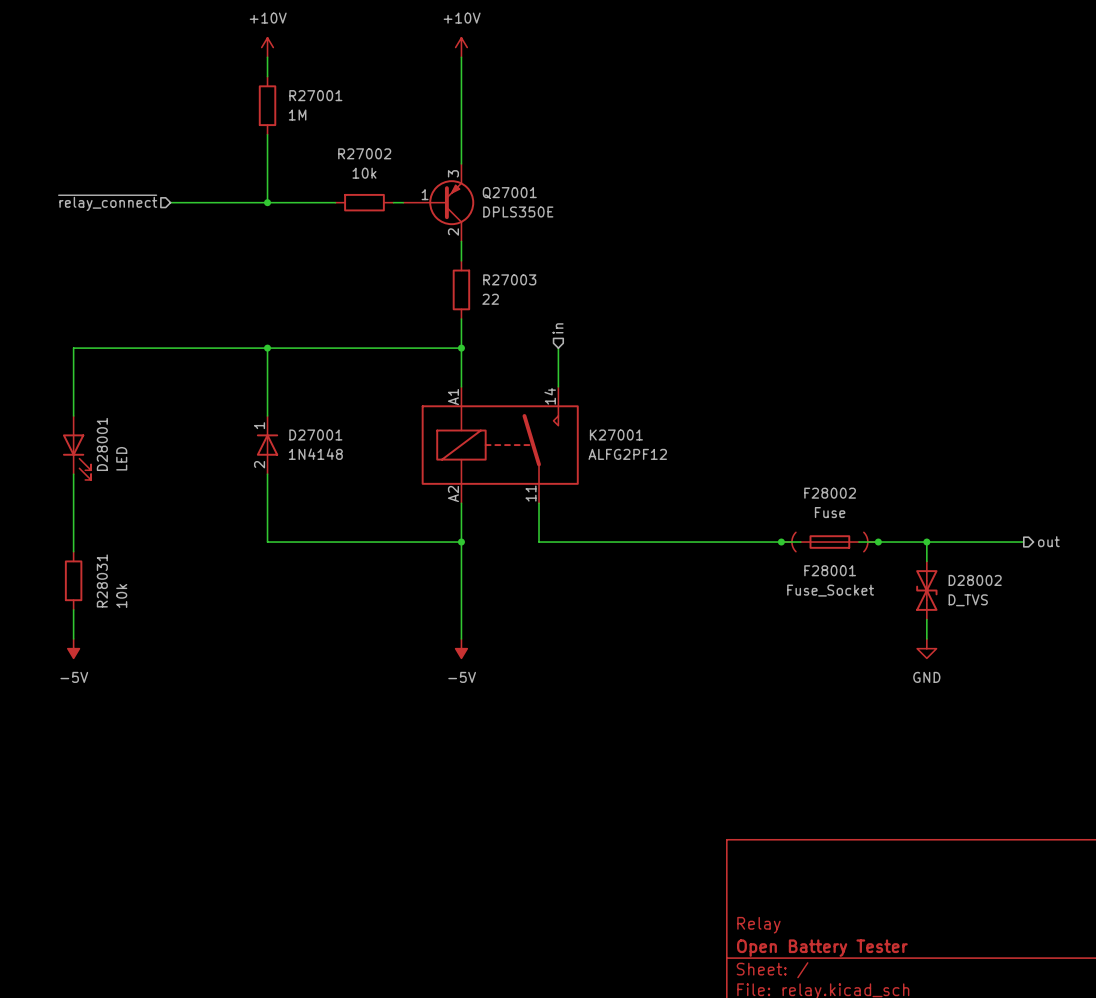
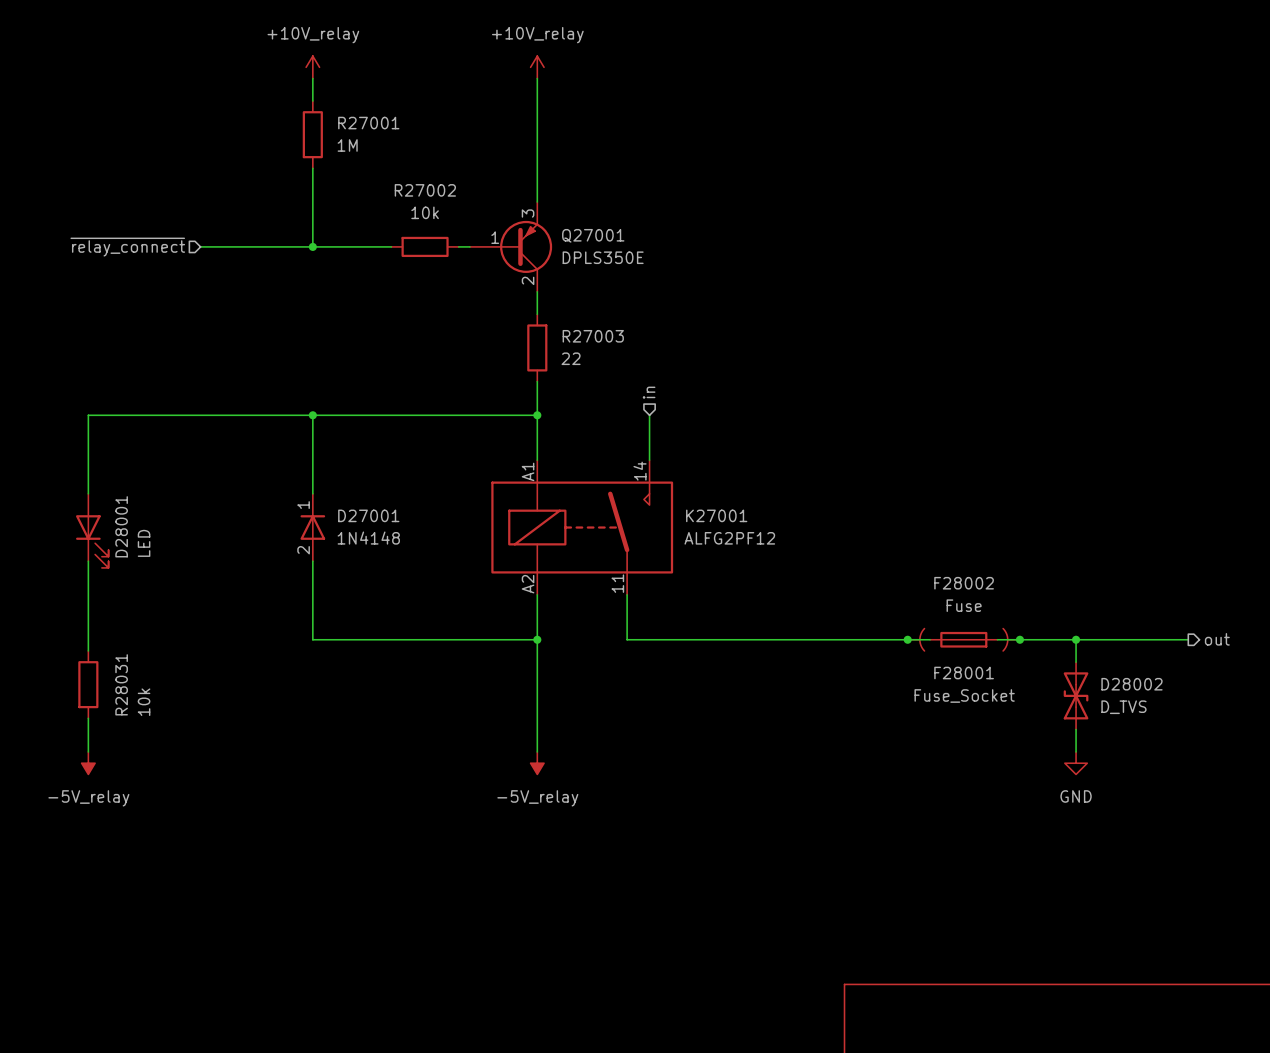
power symbol: +10V (267, 47) -> +10V_relay (312, 67)
power symbol: +10V (461, 47) -> +10V_relay (537, 67)
power symbol: -5V (73, 648) -> -5V_relay (88, 763)
power symbol: -5V (461, 648) -> -5V_relay (537, 763)

